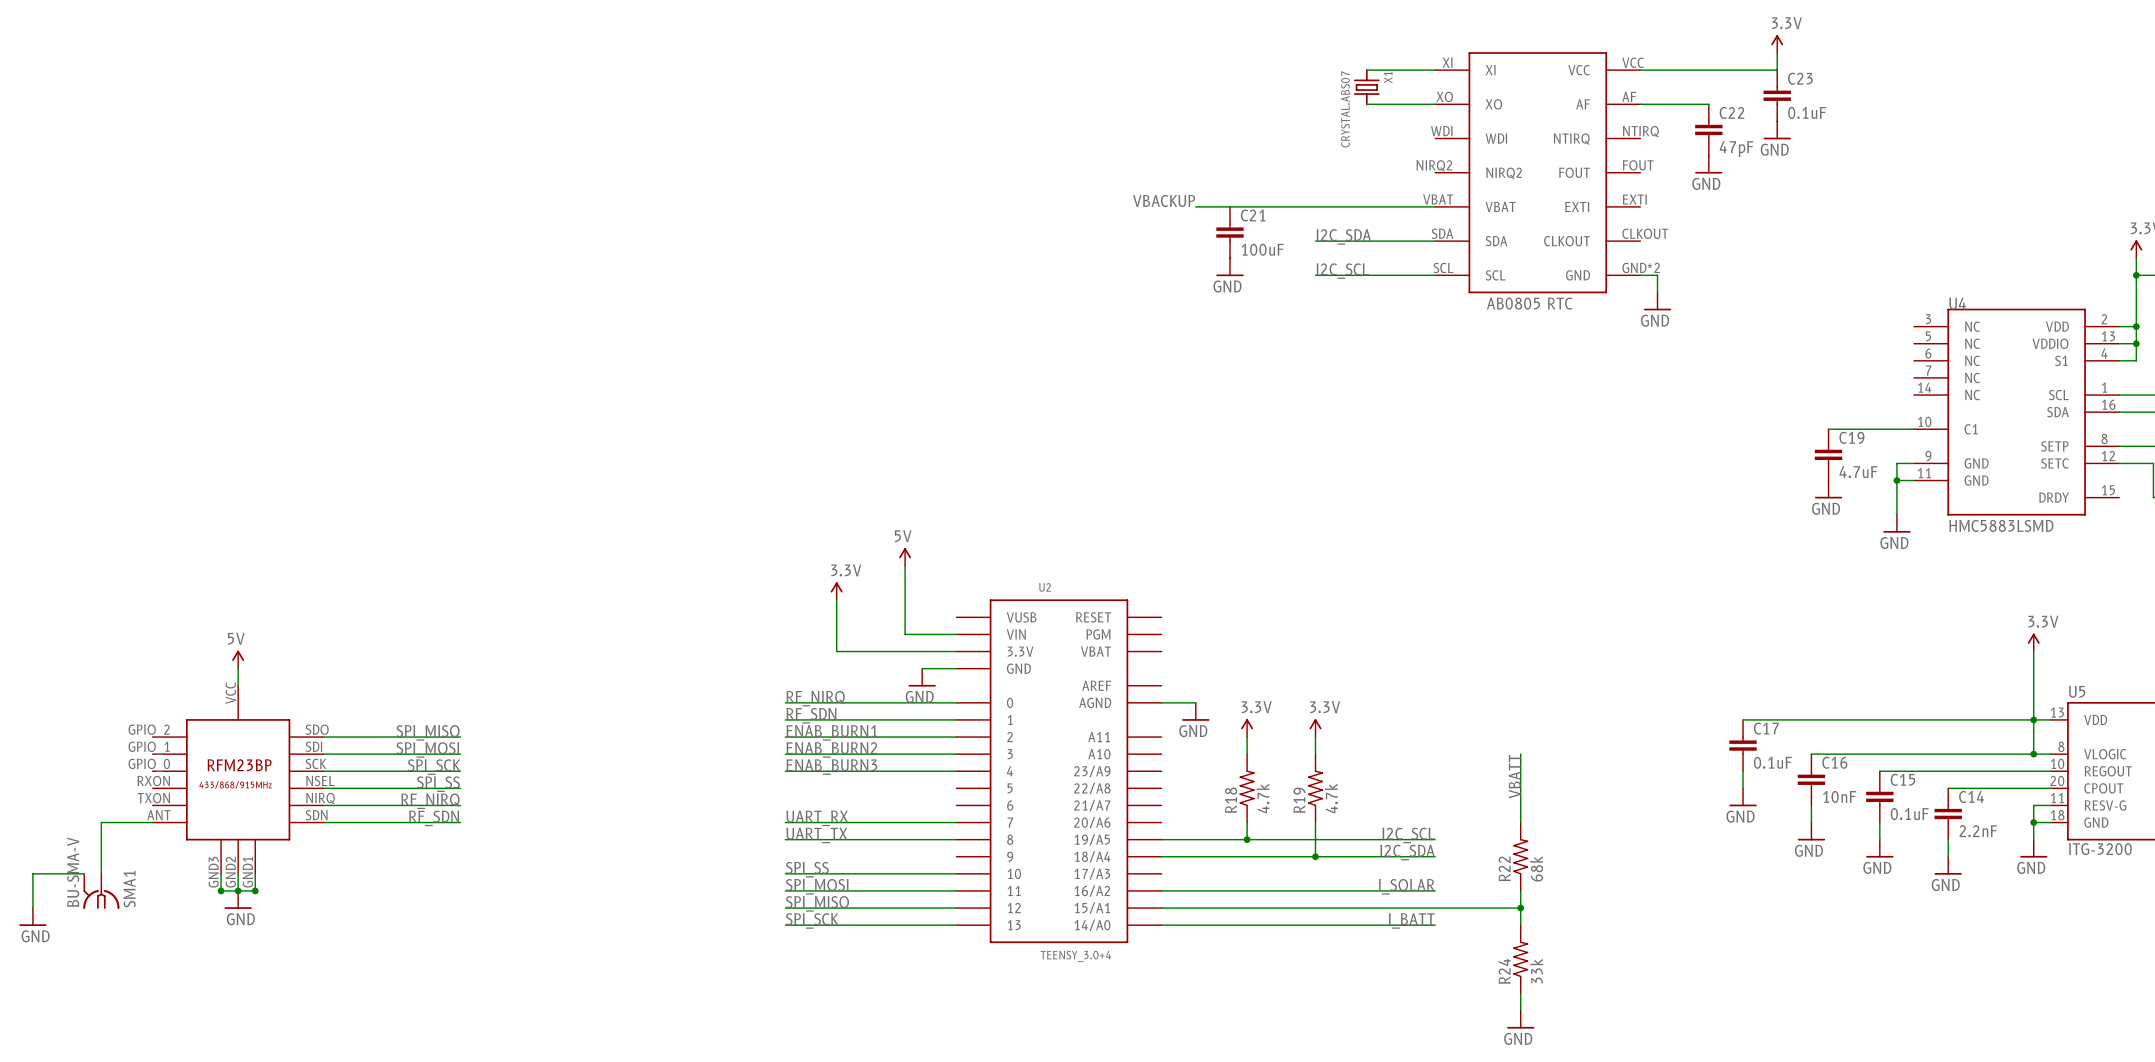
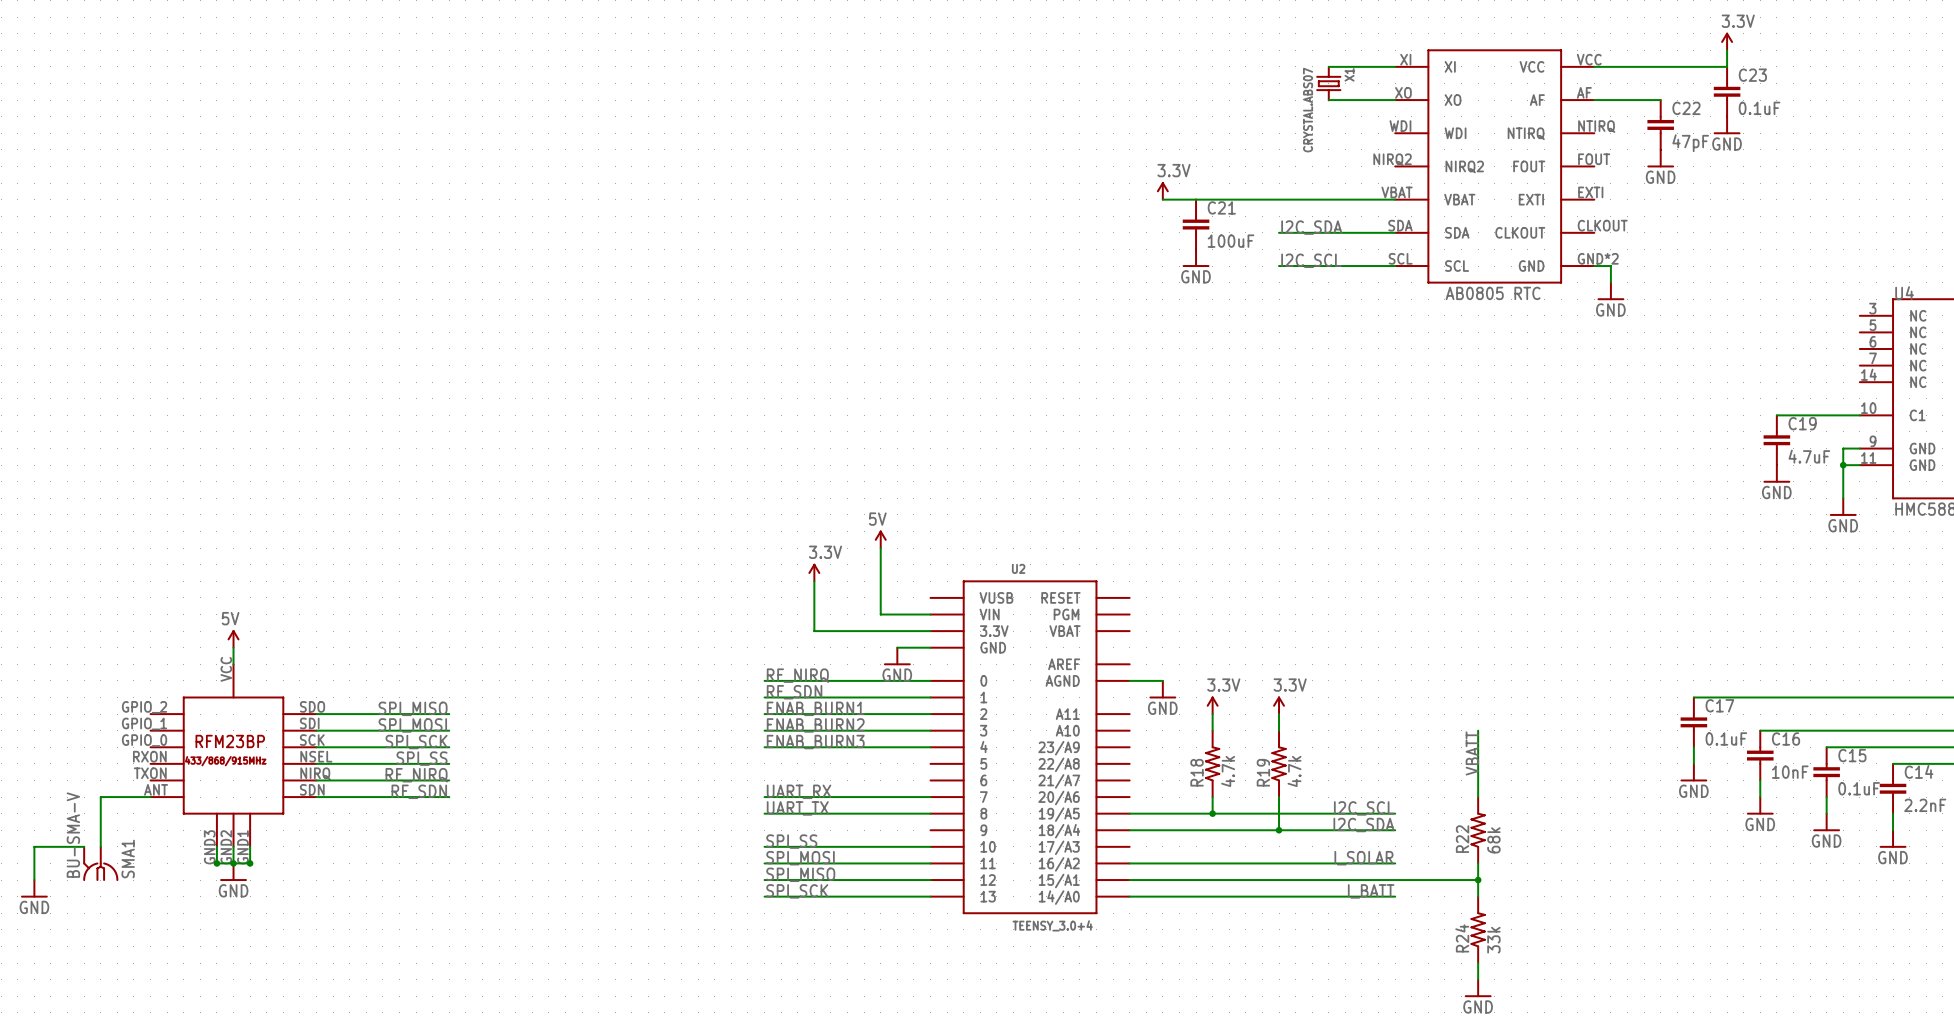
power symbol: none -> 3.3V (1162, 190)
label: VBACKUP (1164, 201) -> none

